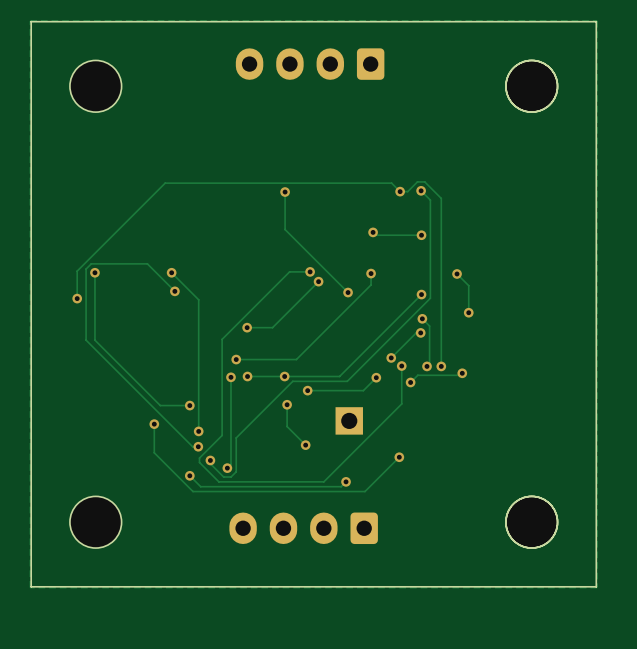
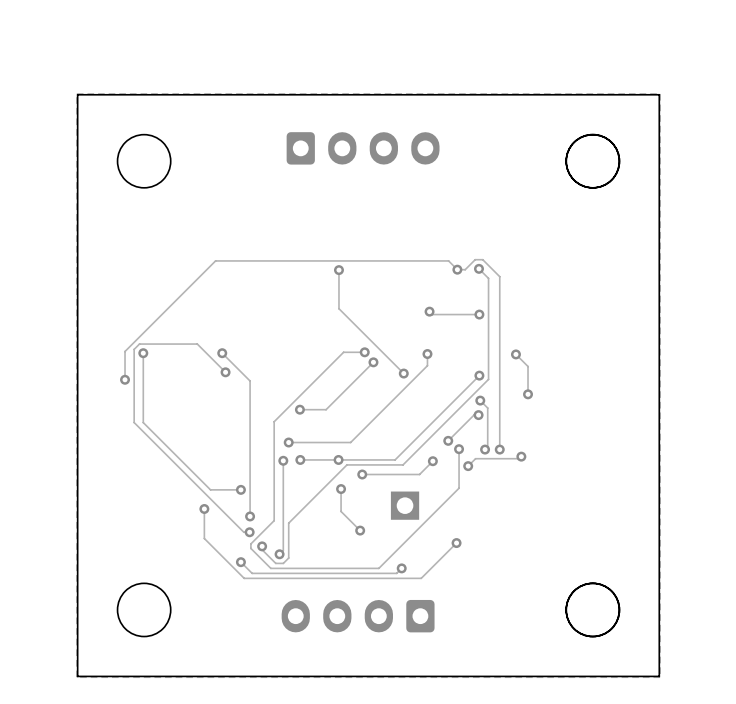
part rotation: 0° (310, 64) -> 180° (363, 148)

